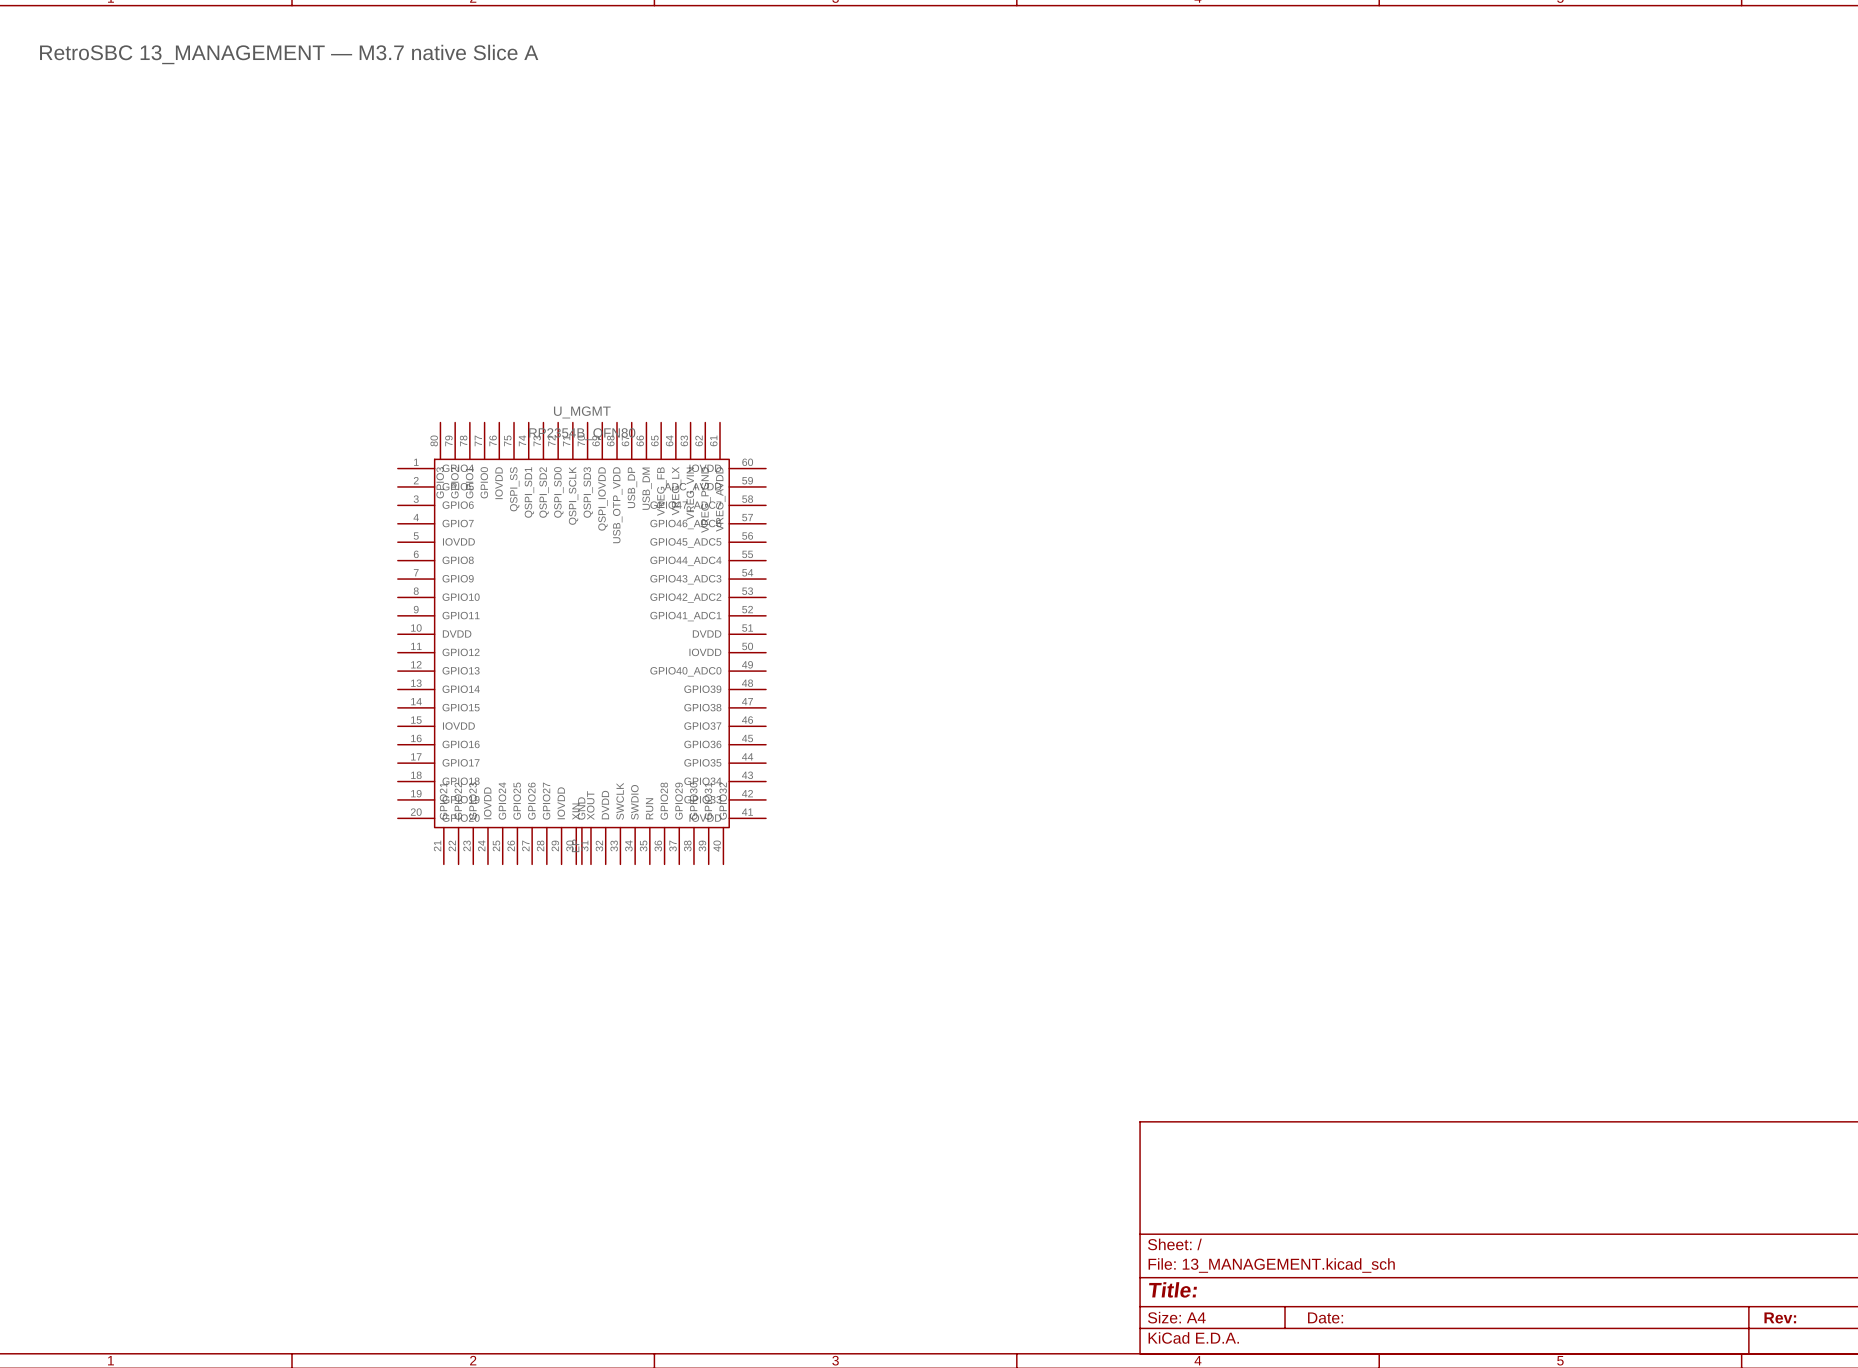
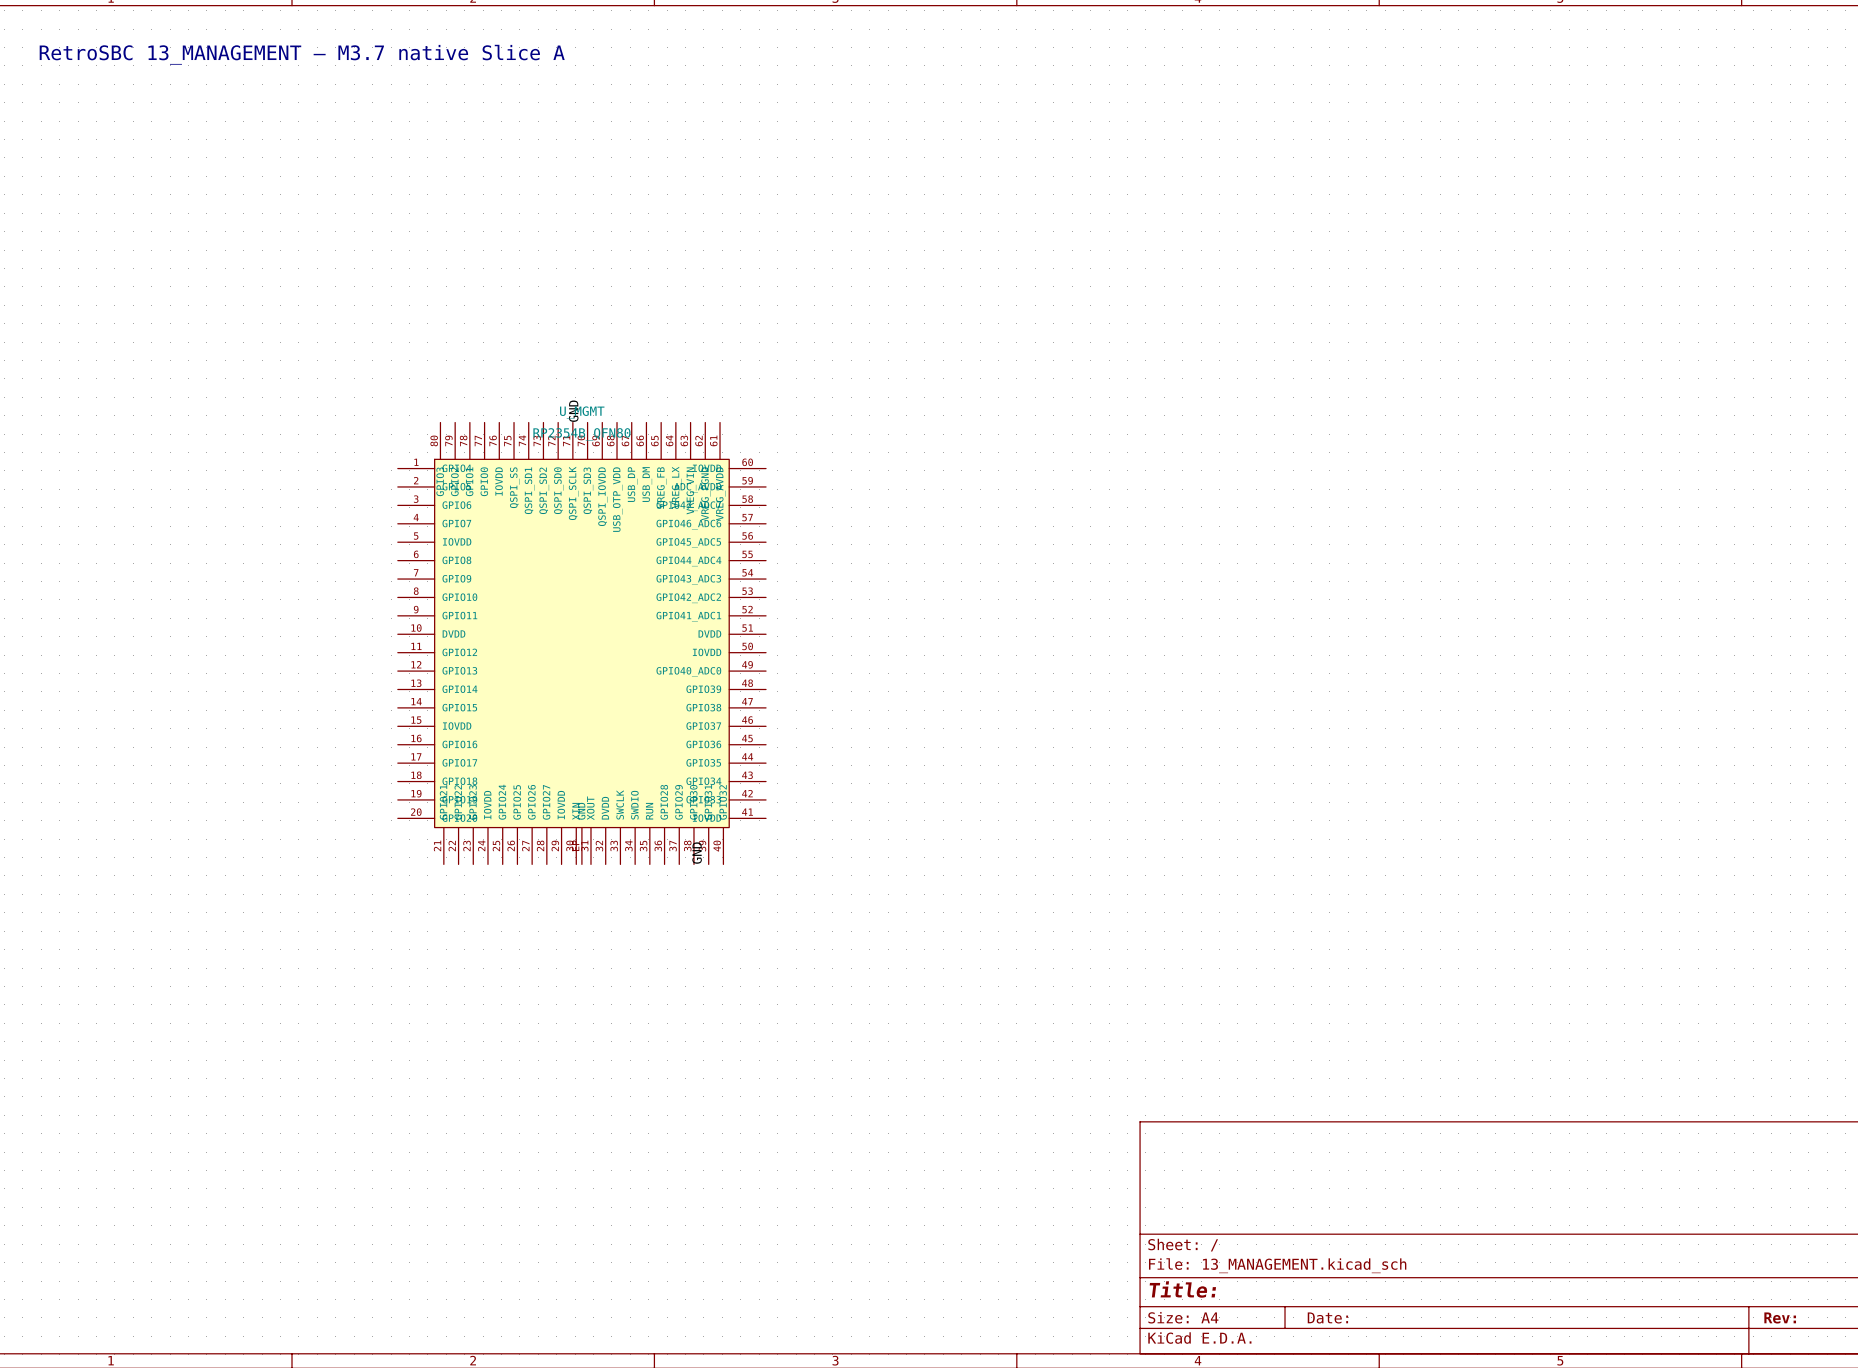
label: none -> GND (573, 411)
label: none -> GND (697, 853)

